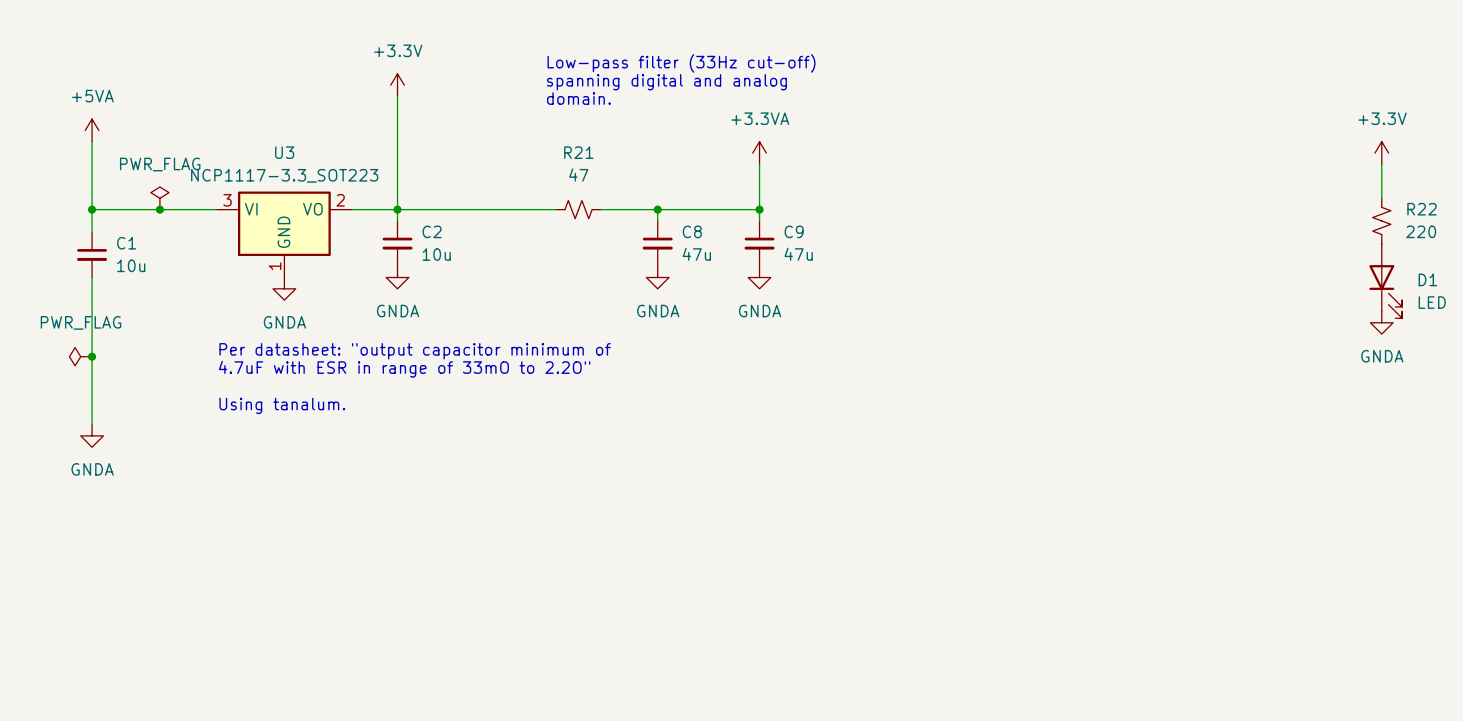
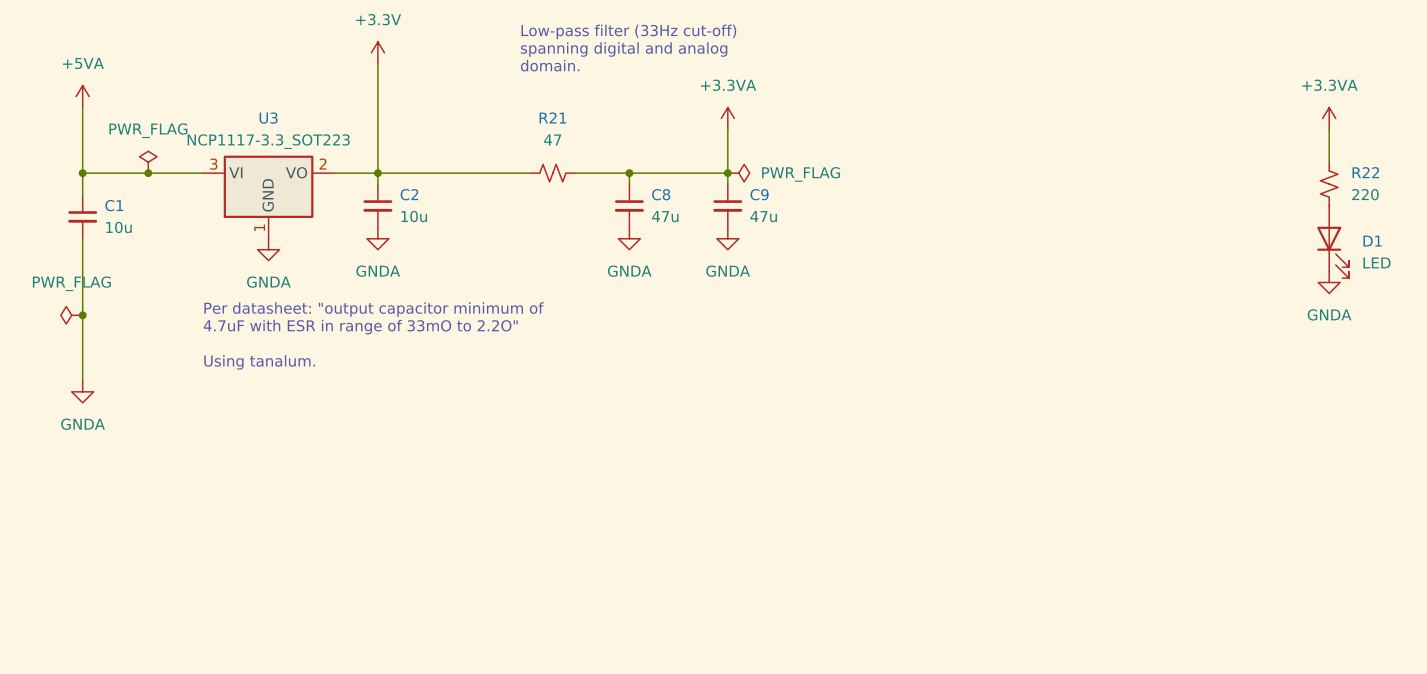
power symbol: +3.3V (1381, 153) -> +3.3VA (1329, 118)
power symbol: none -> PWR_FLAG (738, 173)

